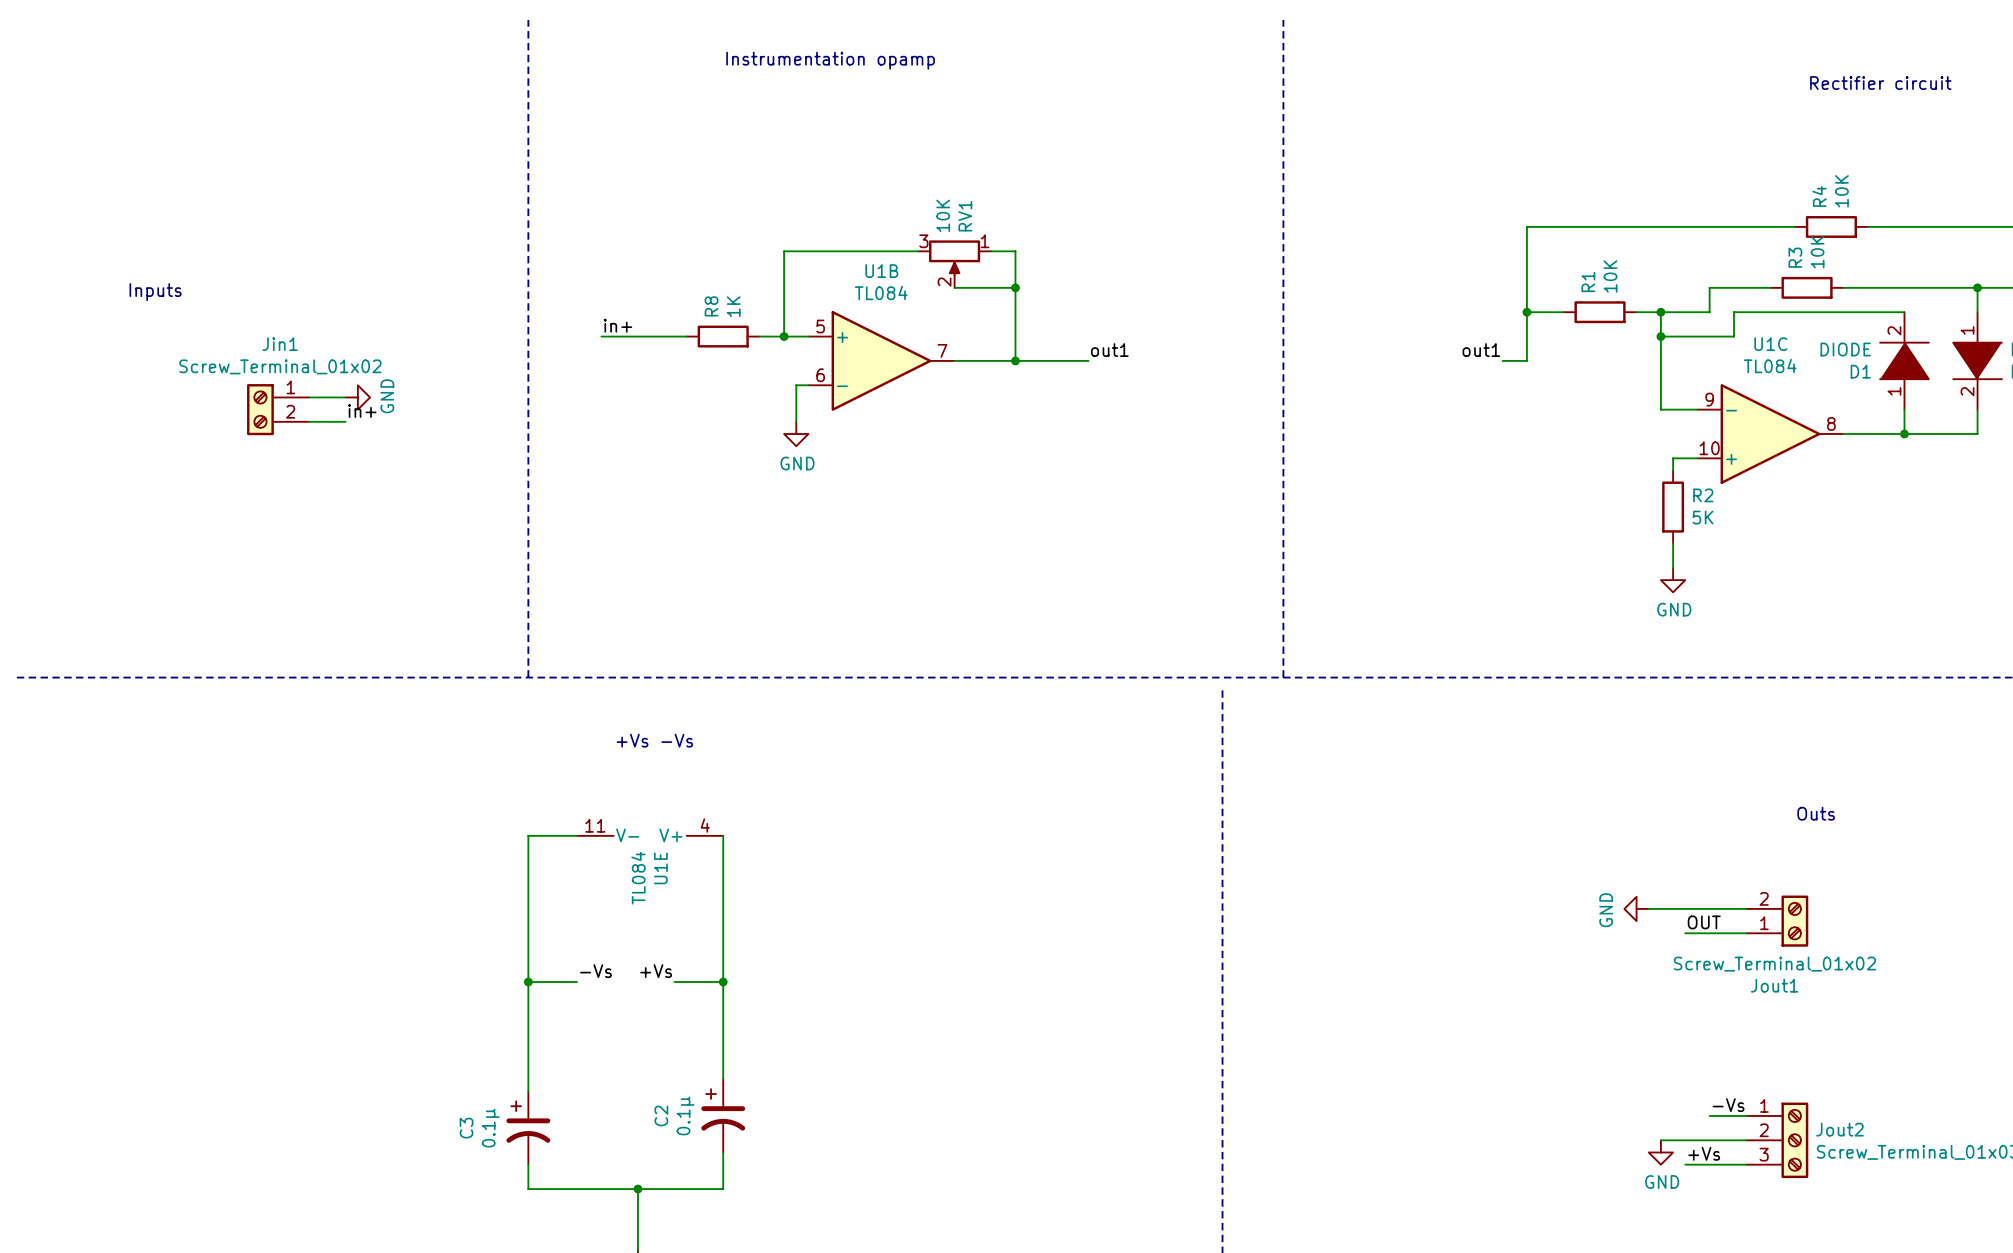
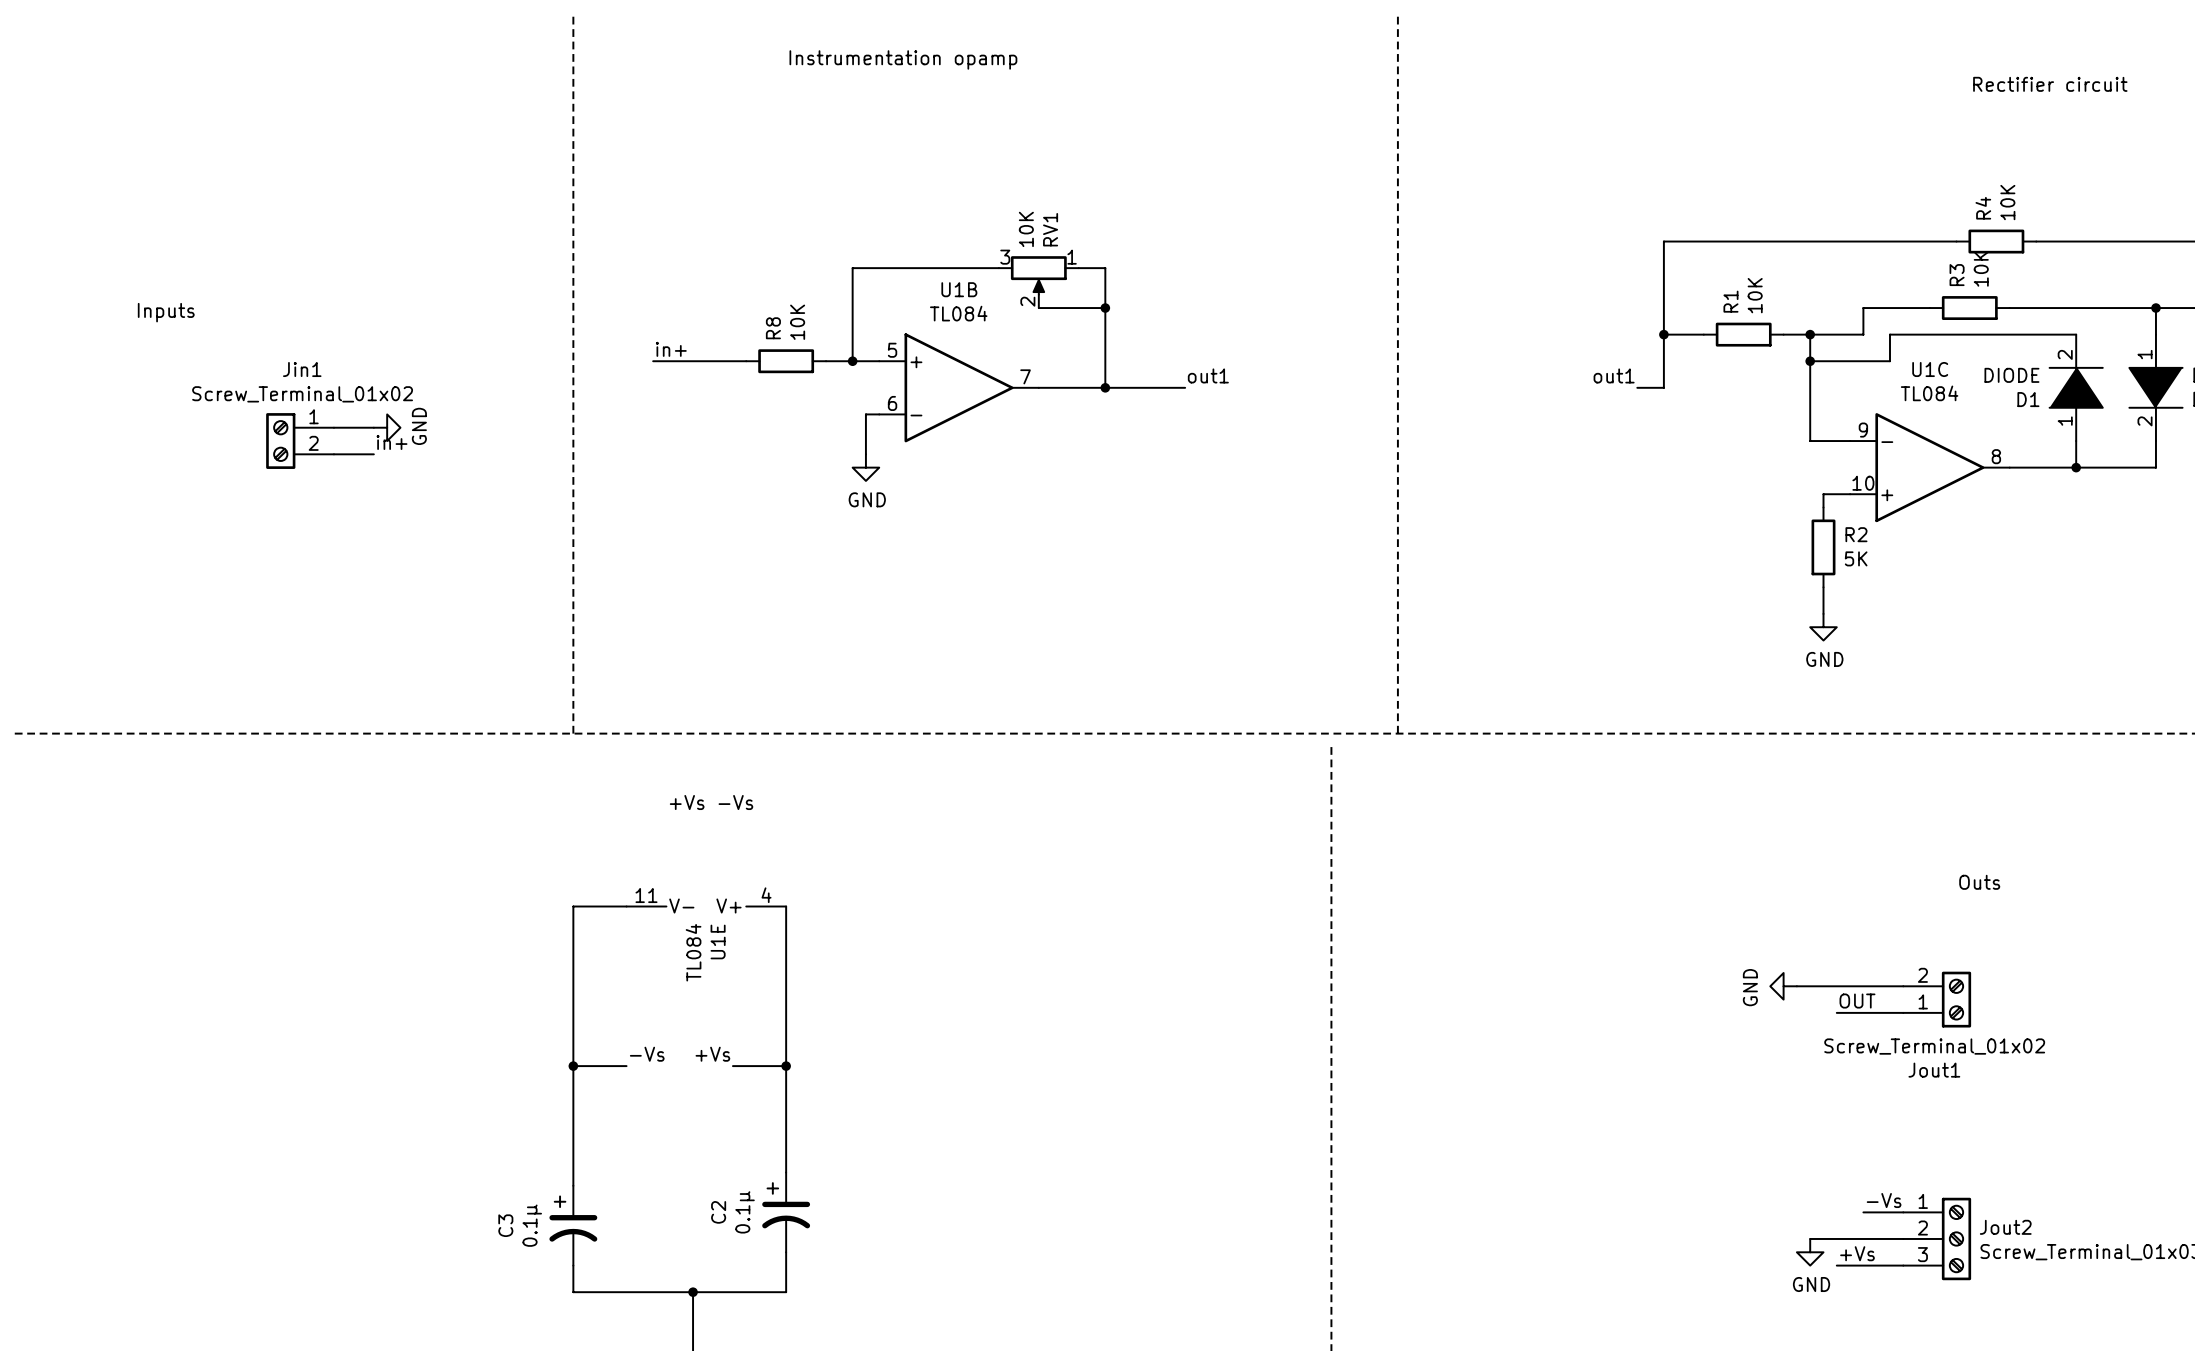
R8 value: 1K (733, 306) -> 10K (797, 322)

